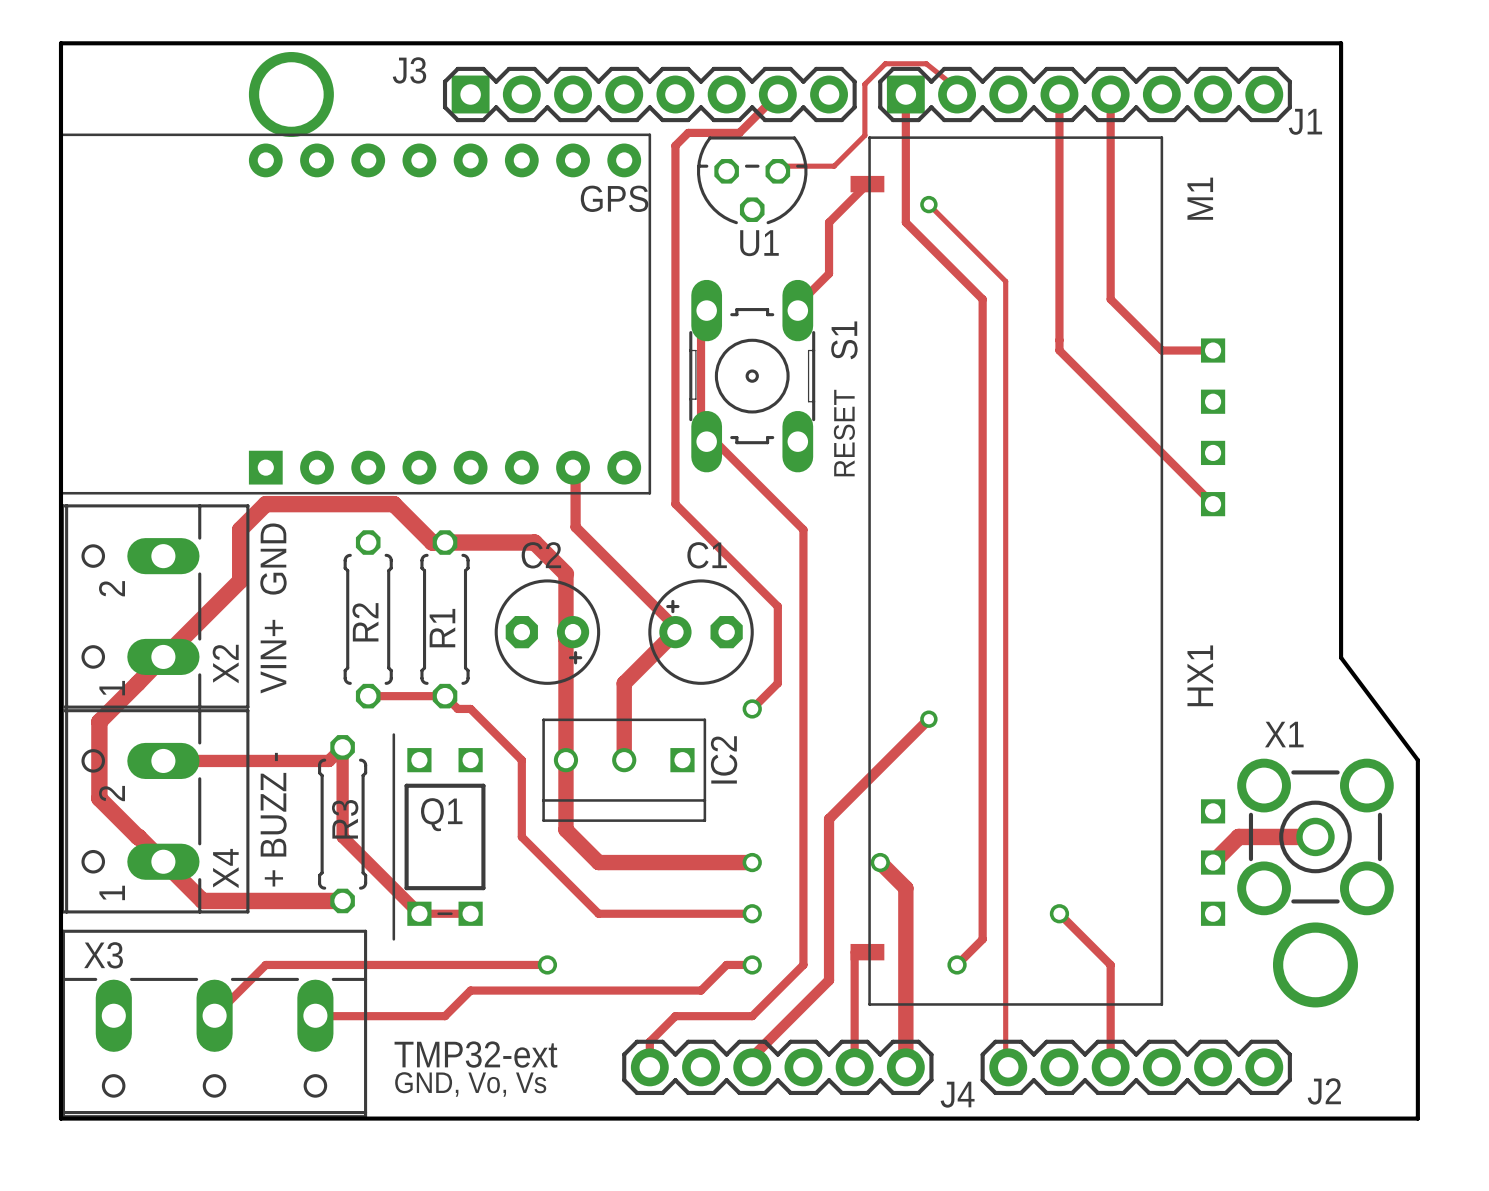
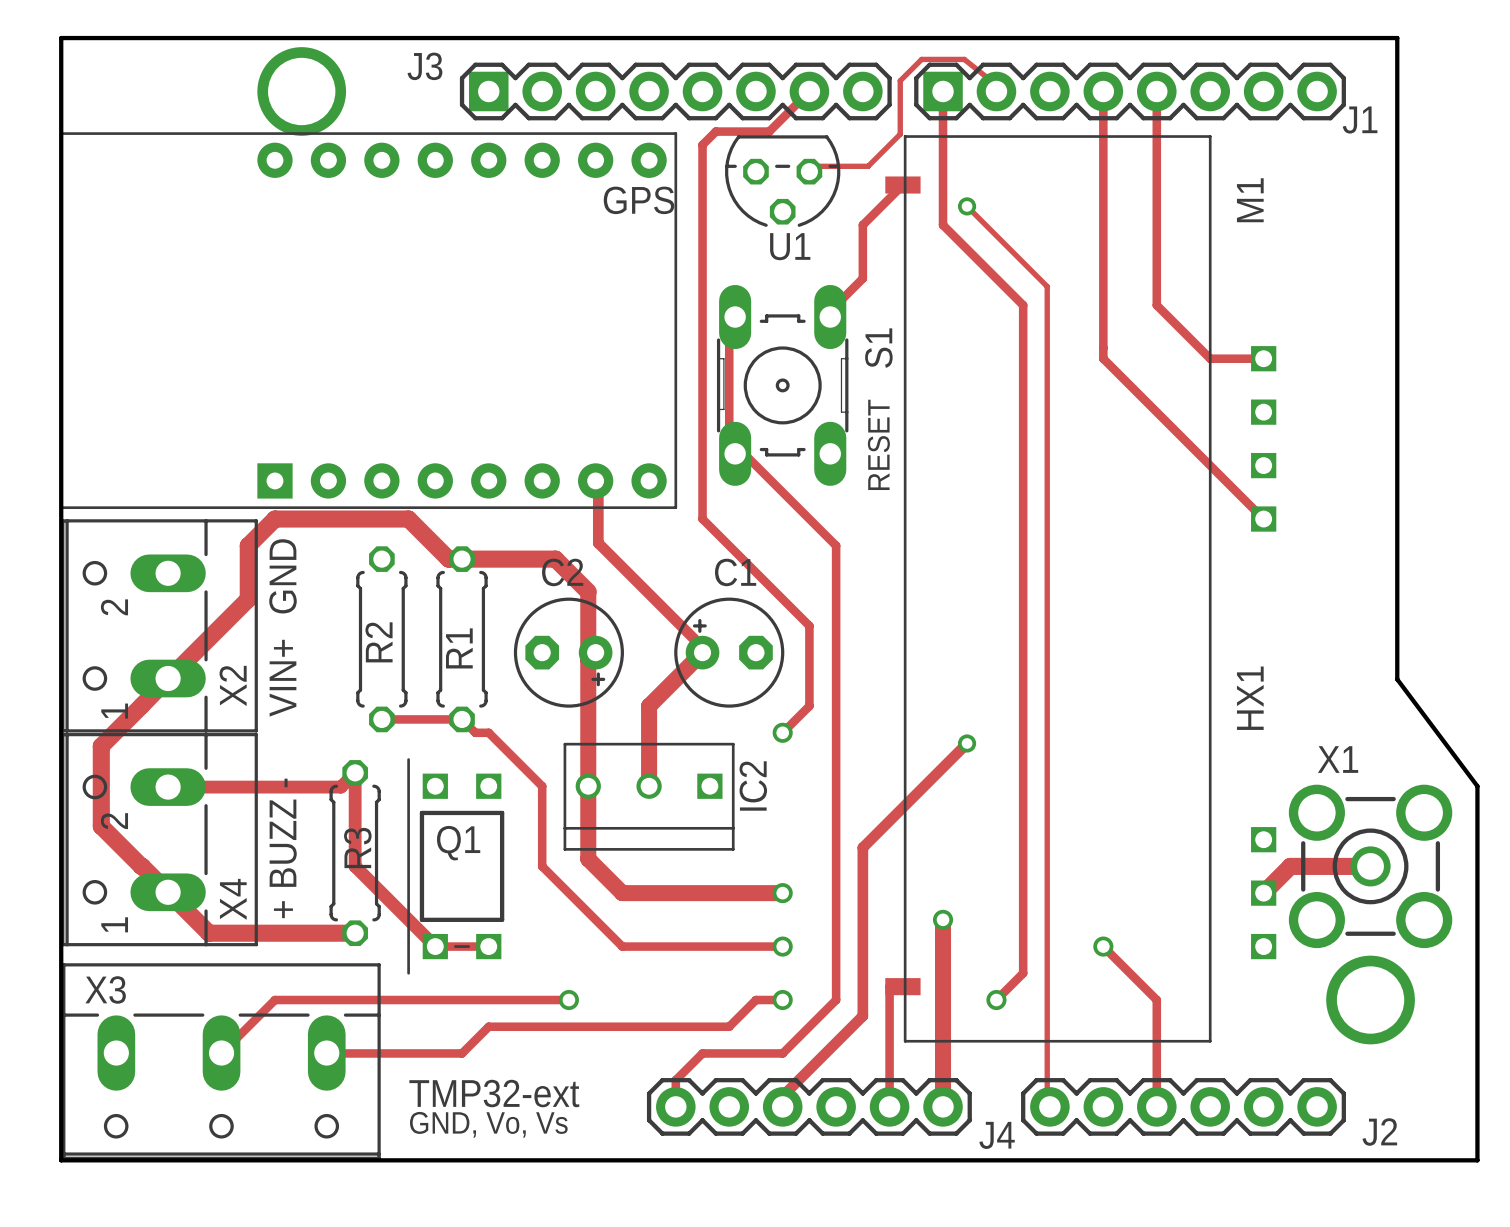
track: (880, 862) (905, 888) -> none
via position: (880, 862) -> (943, 919)

